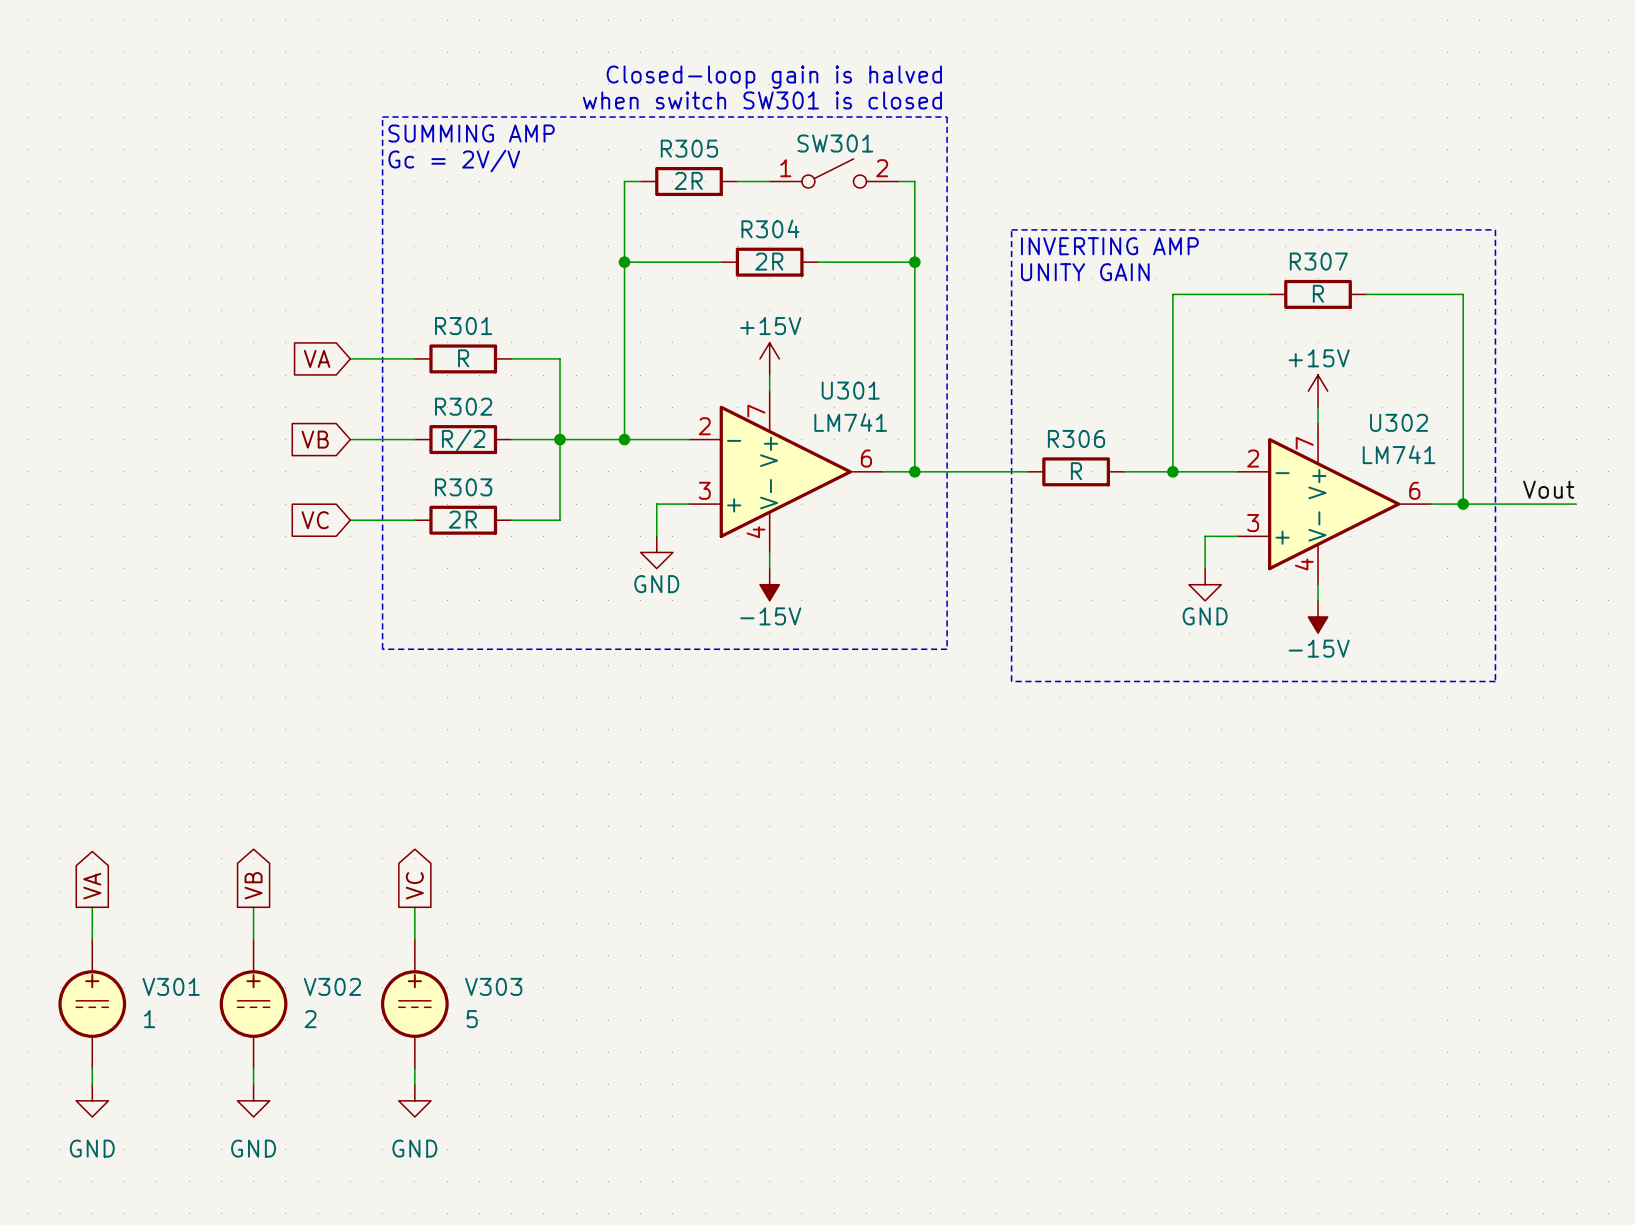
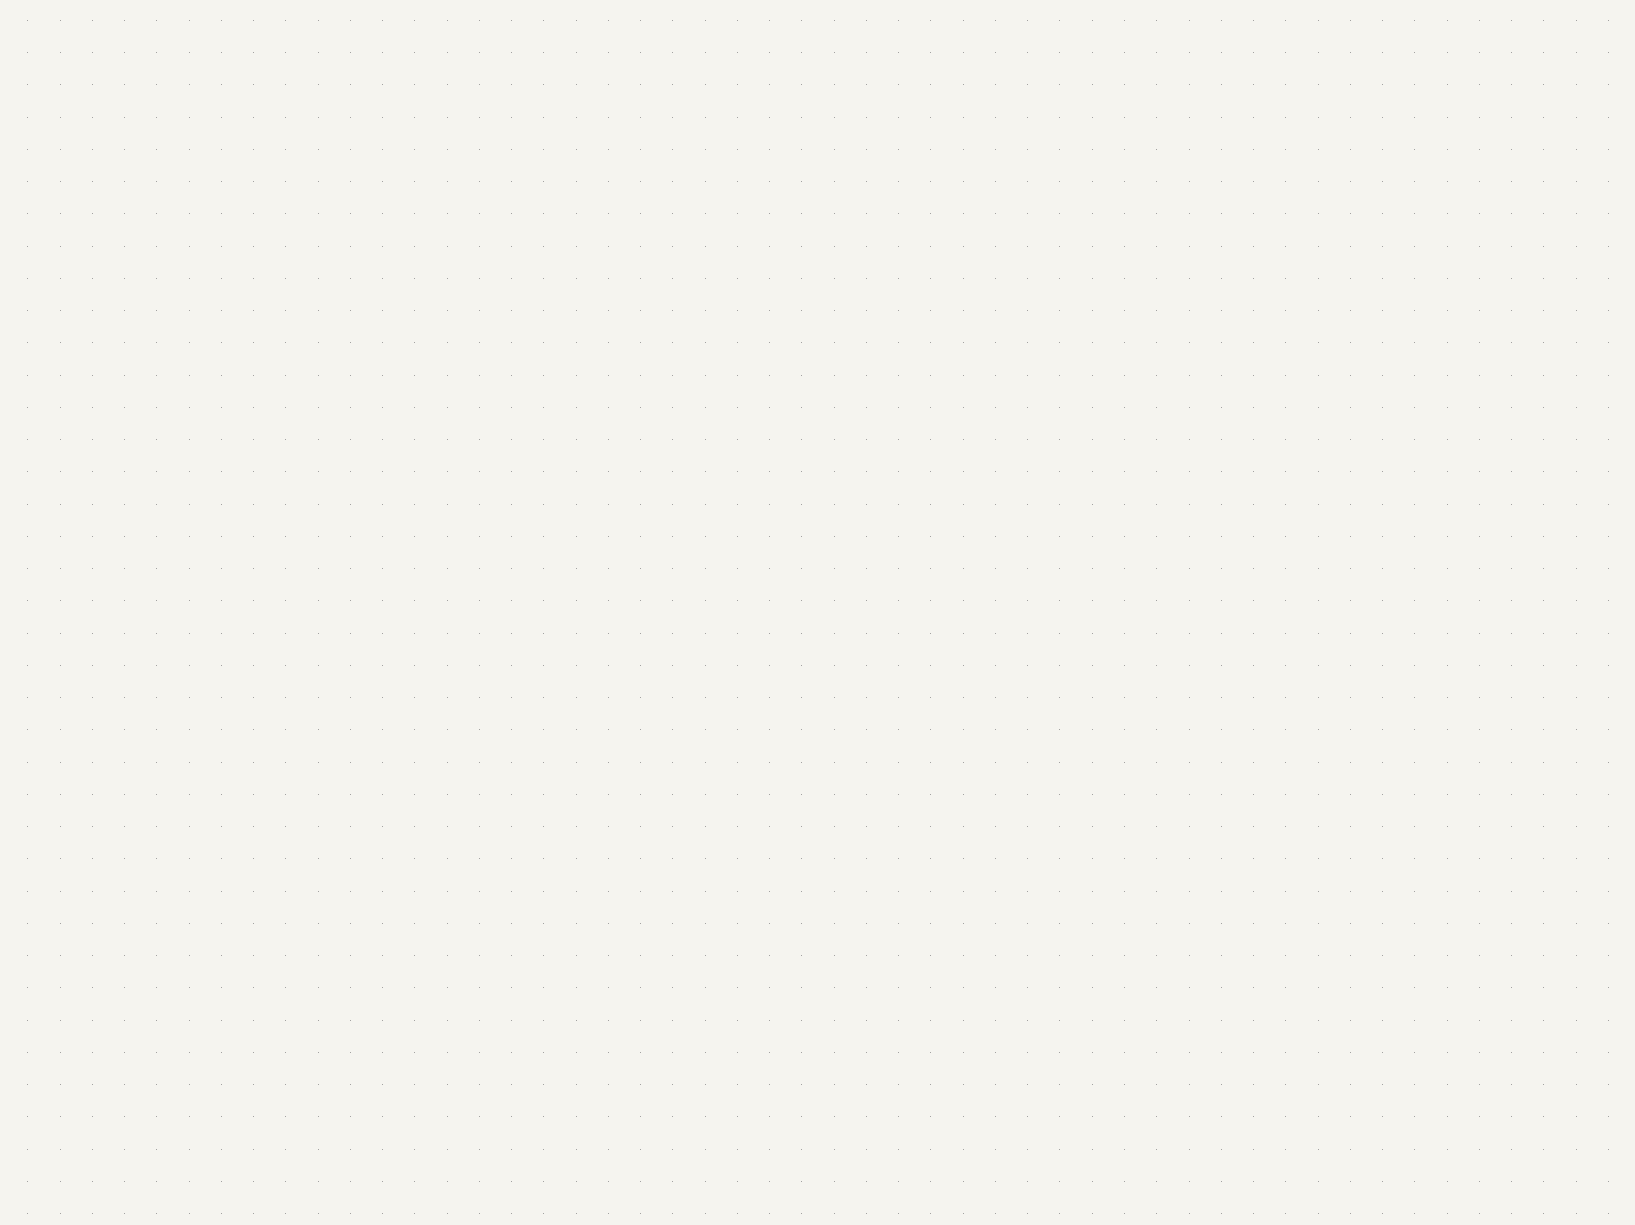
text: Closed-loop gain is halved (774, 77) -> none
text: when switch SW301 is closed (762, 100) -> none
line: (382, 117) (947, 117) (947, 649) (382, 649) (382, 117) -> none
text: SUMMING AMP (471, 133) -> none
text: Gc = 2V/V (454, 161) -> none
SW301: (834, 173) -> none
wire: (640, 181) (624, 181) (624, 439) -> none
R305: 2R (689, 181) -> none
wire: (737, 181) (769, 181) -> none
wire: (898, 181) (914, 181) (914, 471) -> none
line: (1011, 229) (1495, 229) (1495, 681) (1011, 681) (1011, 229) -> none
text: INVERTING AMP (1109, 246) -> none
wire: (624, 262) (721, 262) -> none
junction: (624, 262) -> none
R304: 2R (769, 262) -> none
wire: (818, 262) (914, 262) -> none
junction: (914, 262) -> none
text: UNITY GAIN (1085, 272) -> none
wire: (1269, 294) (1172, 294) (1172, 471) -> none
R307: R (1318, 294) -> none
wire: (1366, 294) (1463, 294) (1463, 504) -> none
global label: VA (317, 358) -> none
wire: (350, 358) (414, 358) -> none
R301: R (463, 358) -> none
wire: (511, 358) (560, 358) (560, 520) (511, 520) -> none
power symbol: +15V (769, 358) -> none
wire: (769, 375) (769, 391) -> none
power symbol: +15V (1318, 391) -> none
wire: (1318, 407) (1318, 423) -> none
global label: VB (315, 439) -> none
wire: (350, 439) (414, 439) -> none
R302: R/2 (463, 439) -> none
wire: (511, 439) (689, 439) -> none
junction: (560, 439) -> none
junction: (624, 439) -> none
U301: LM741 (785, 471) -> none
wire: (882, 471) (1027, 471) -> none
junction: (914, 471) -> none
R306: R (1076, 471) -> none
wire: (1124, 471) (1237, 471) -> none
junction: (1172, 471) -> none
label: Vout (1548, 489) -> none
wire: (689, 504) (656, 504) (656, 536) -> none
U302: LM741 (1334, 504) -> none
wire: (1430, 504) (1576, 504) -> none
junction: (1463, 504) -> none
global label: VC (315, 520) -> none
wire: (350, 520) (414, 520) -> none
R303: 2R (463, 520) -> none
wire: (1237, 536) (1205, 536) (1205, 568) -> none
power symbol: GND (656, 552) -> none
wire: (769, 552) (769, 568) -> none
power symbol: -15V (769, 584) -> none
power symbol: GND (1205, 584) -> none
wire: (1318, 584) (1318, 600) -> none
power symbol: -15V (1318, 616) -> none
global label: VB (253, 885) -> none
global label: VC (414, 885) -> none
global label: VA (92, 886) -> none
wire: (92, 907) (92, 939) -> none
wire: (253, 907) (253, 939) -> none
wire: (414, 907) (414, 939) -> none
V301: 1 (92, 1004) -> none
V302: 2 (253, 1004) -> none
V303: 5 (414, 1004) -> none
wire: (92, 1068) (92, 1084) -> none
wire: (253, 1068) (253, 1084) -> none
wire: (414, 1068) (414, 1084) -> none
power symbol: GND (92, 1100) -> none
power symbol: GND (253, 1100) -> none
power symbol: GND (414, 1100) -> none

